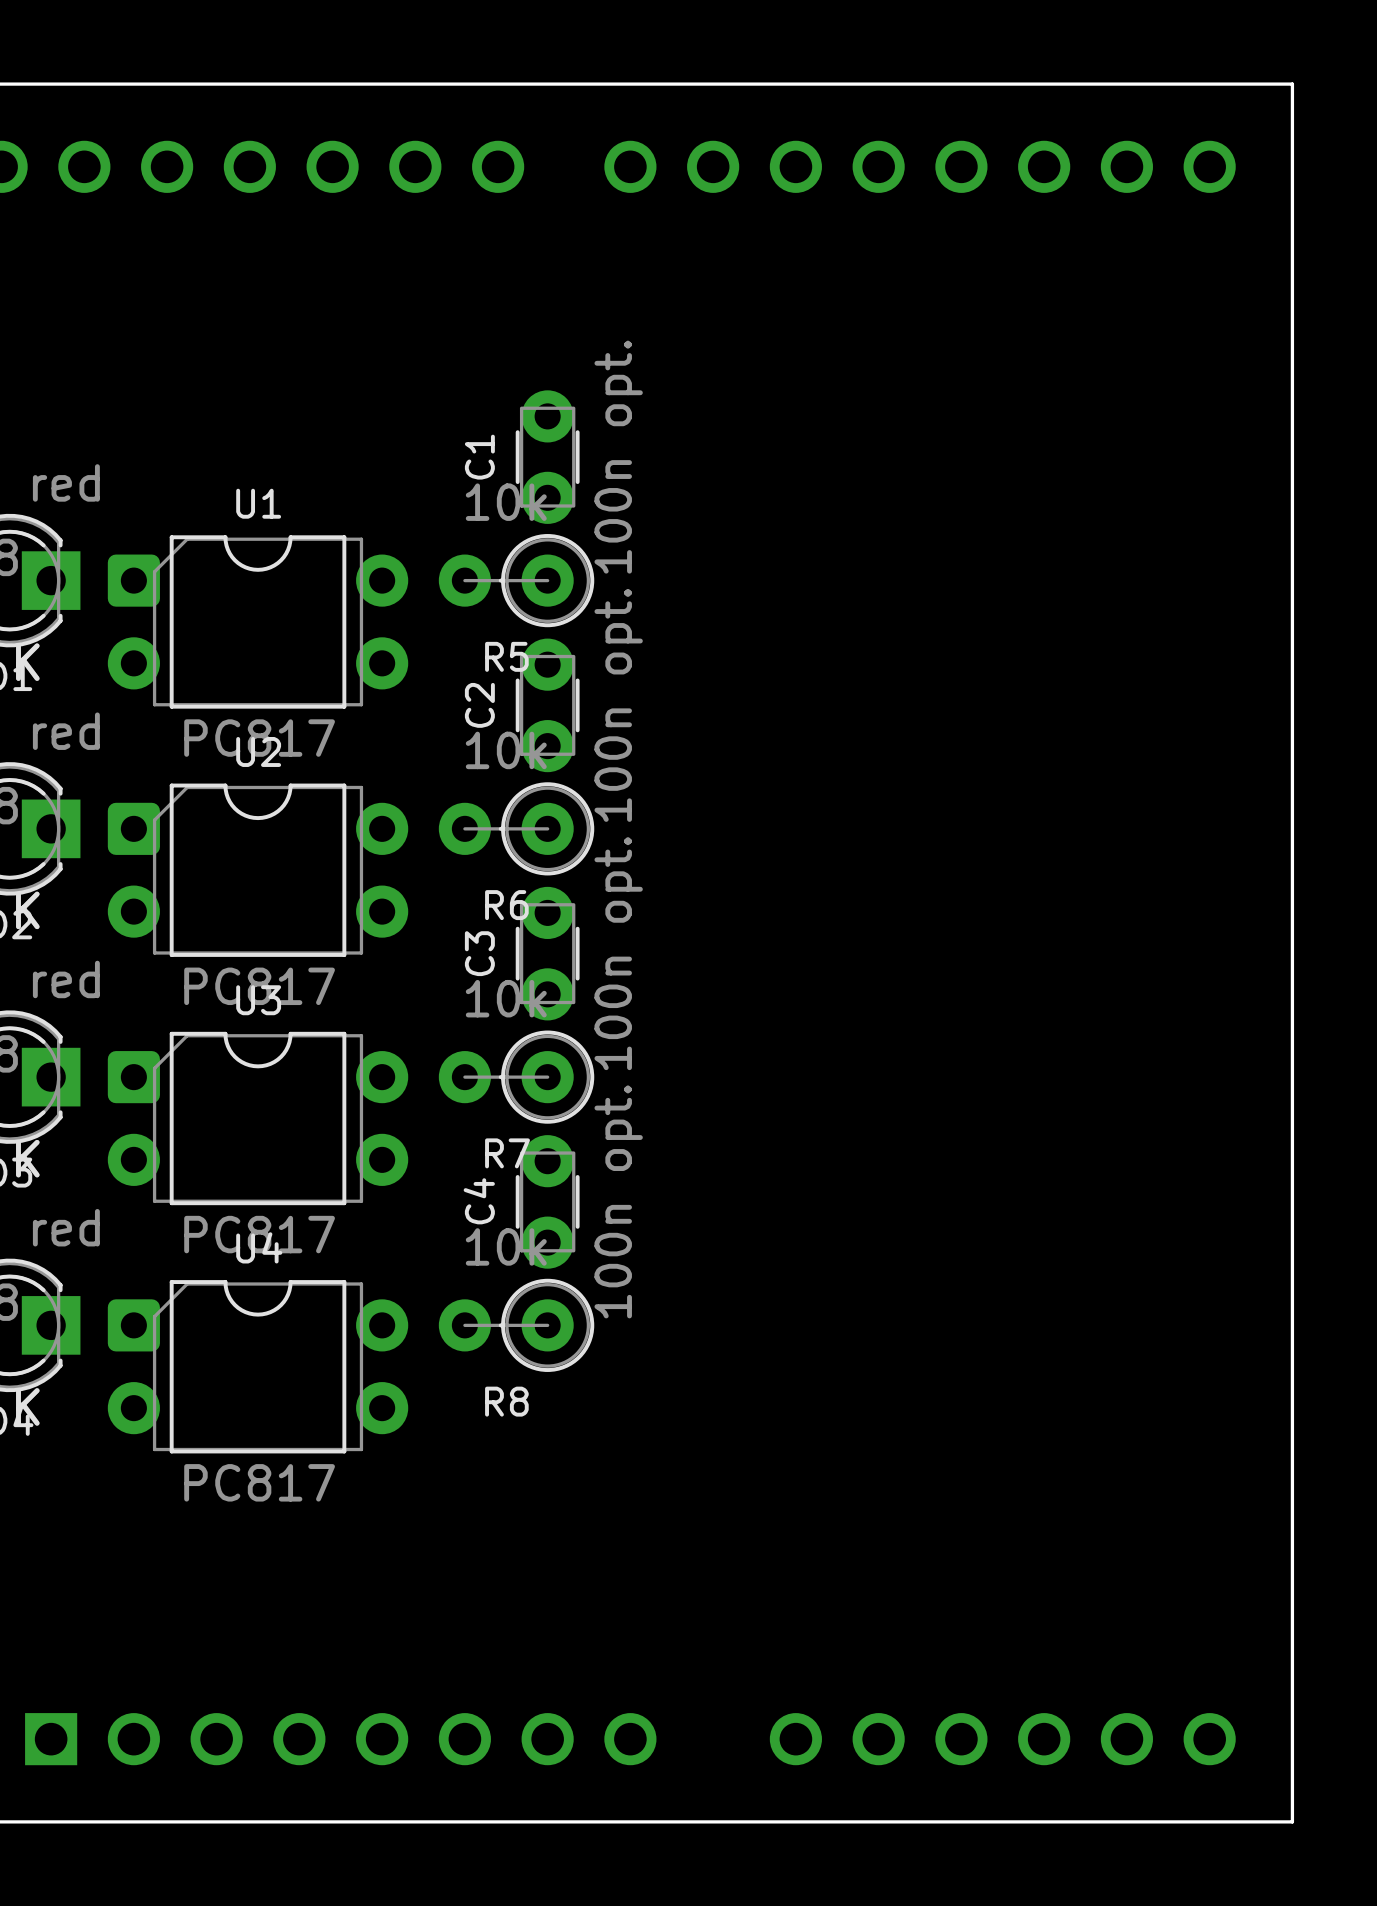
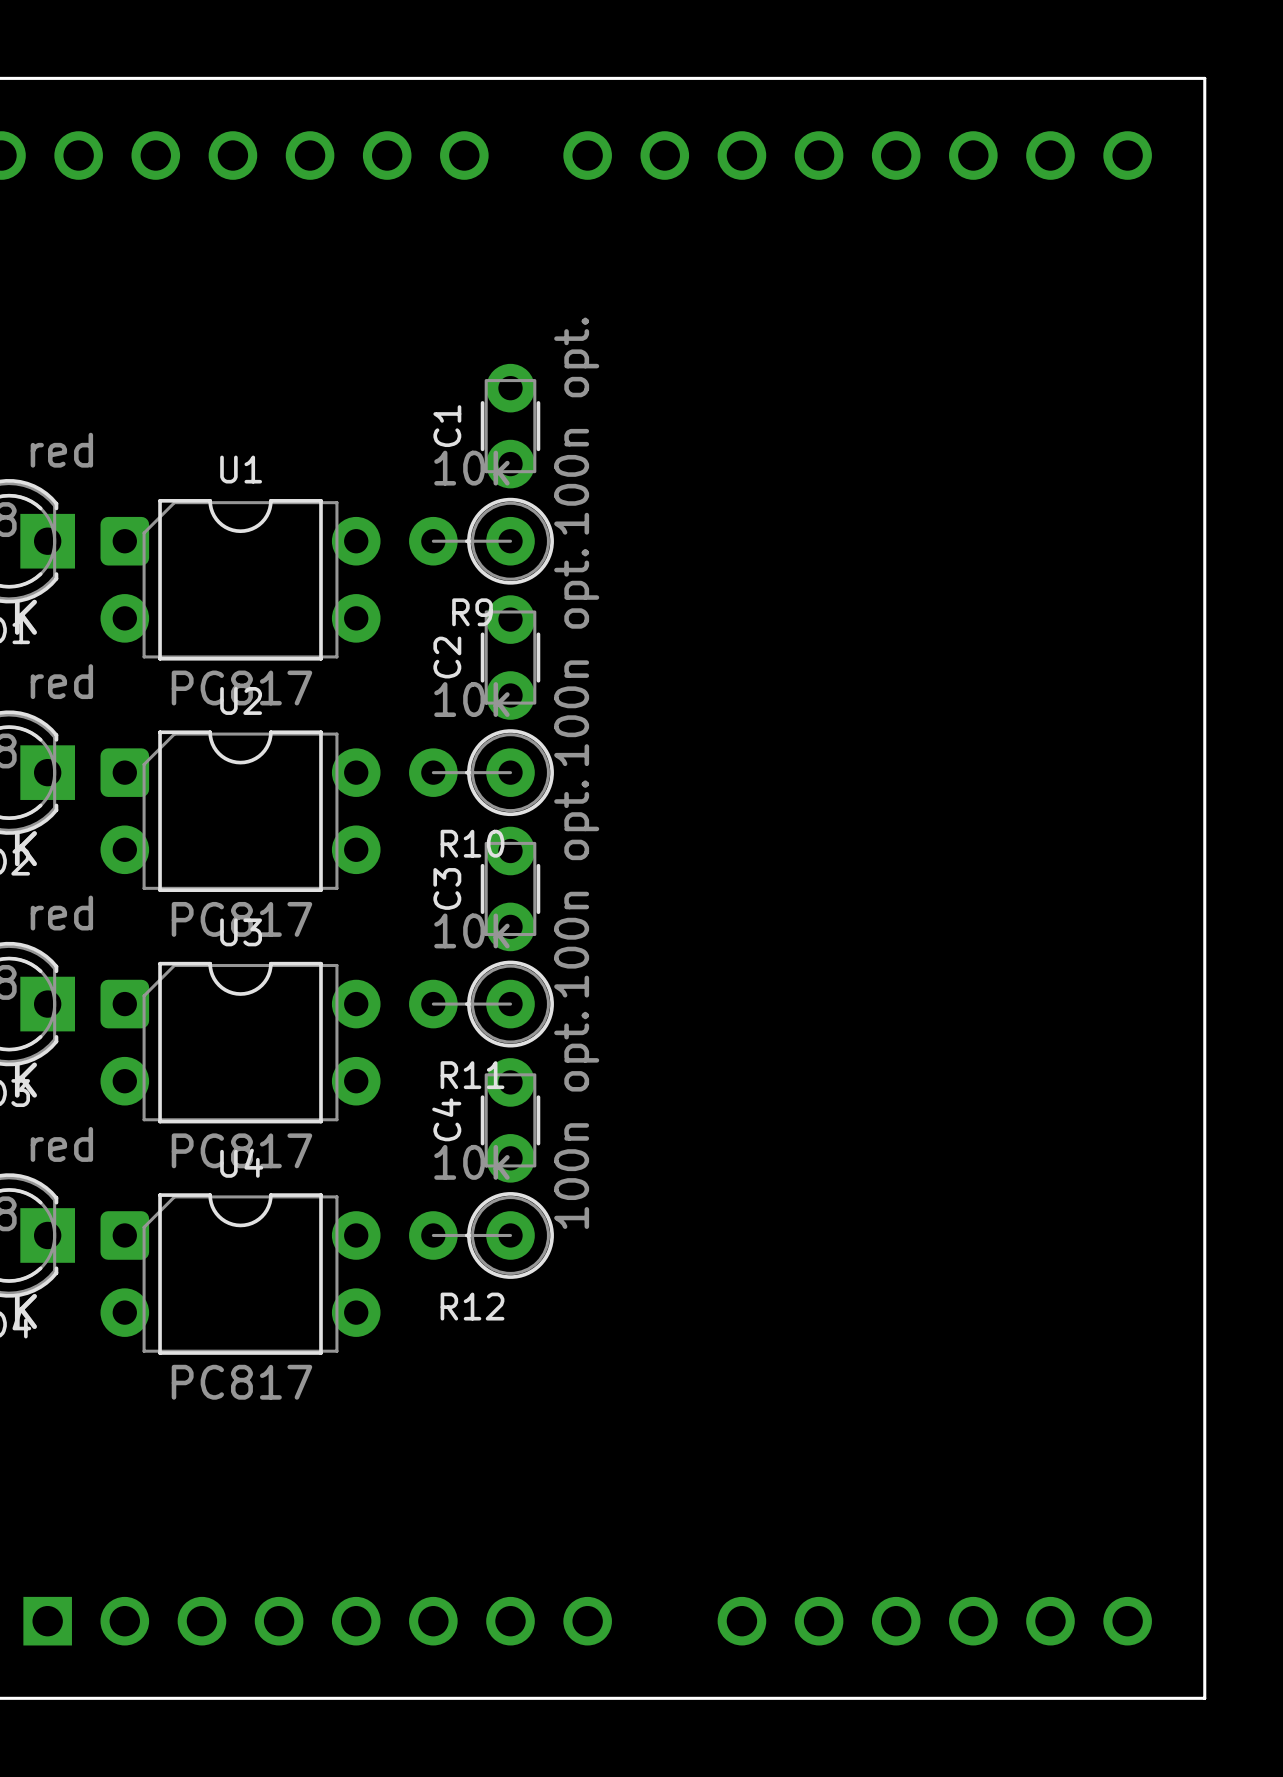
R5 name: R5 (506, 656) -> R9 (472, 612)
R6 name: R6 (506, 905) -> R10 (472, 843)
R7 name: R7 (507, 1153) -> R11 (472, 1075)
R8 name: R8 (506, 1401) -> R12 (472, 1306)

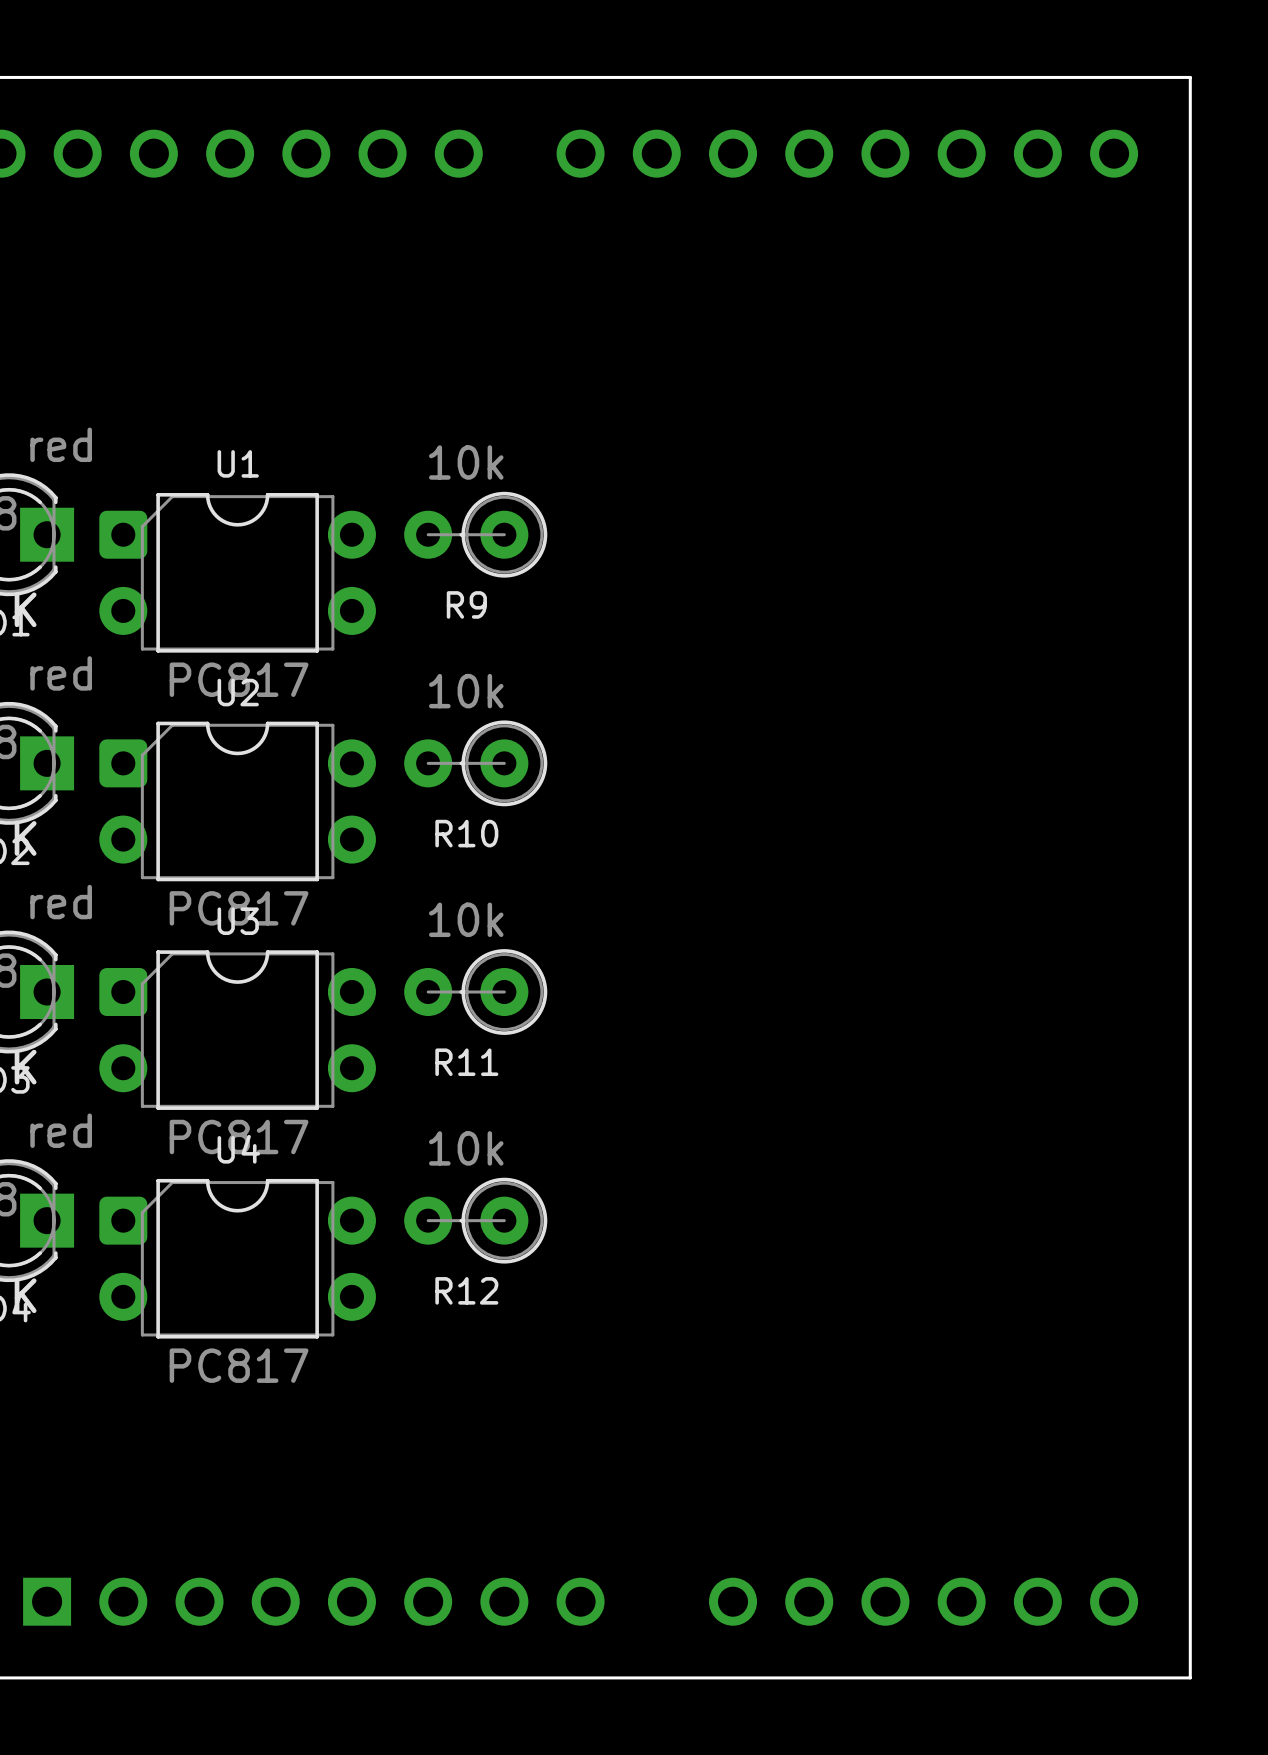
C1: 100n opt. (510, 426) -> none
C2: 100n opt. (510, 657) -> none
C3: 100n opt. (510, 888) -> none
C4: 100n opt. (510, 1120) -> none

